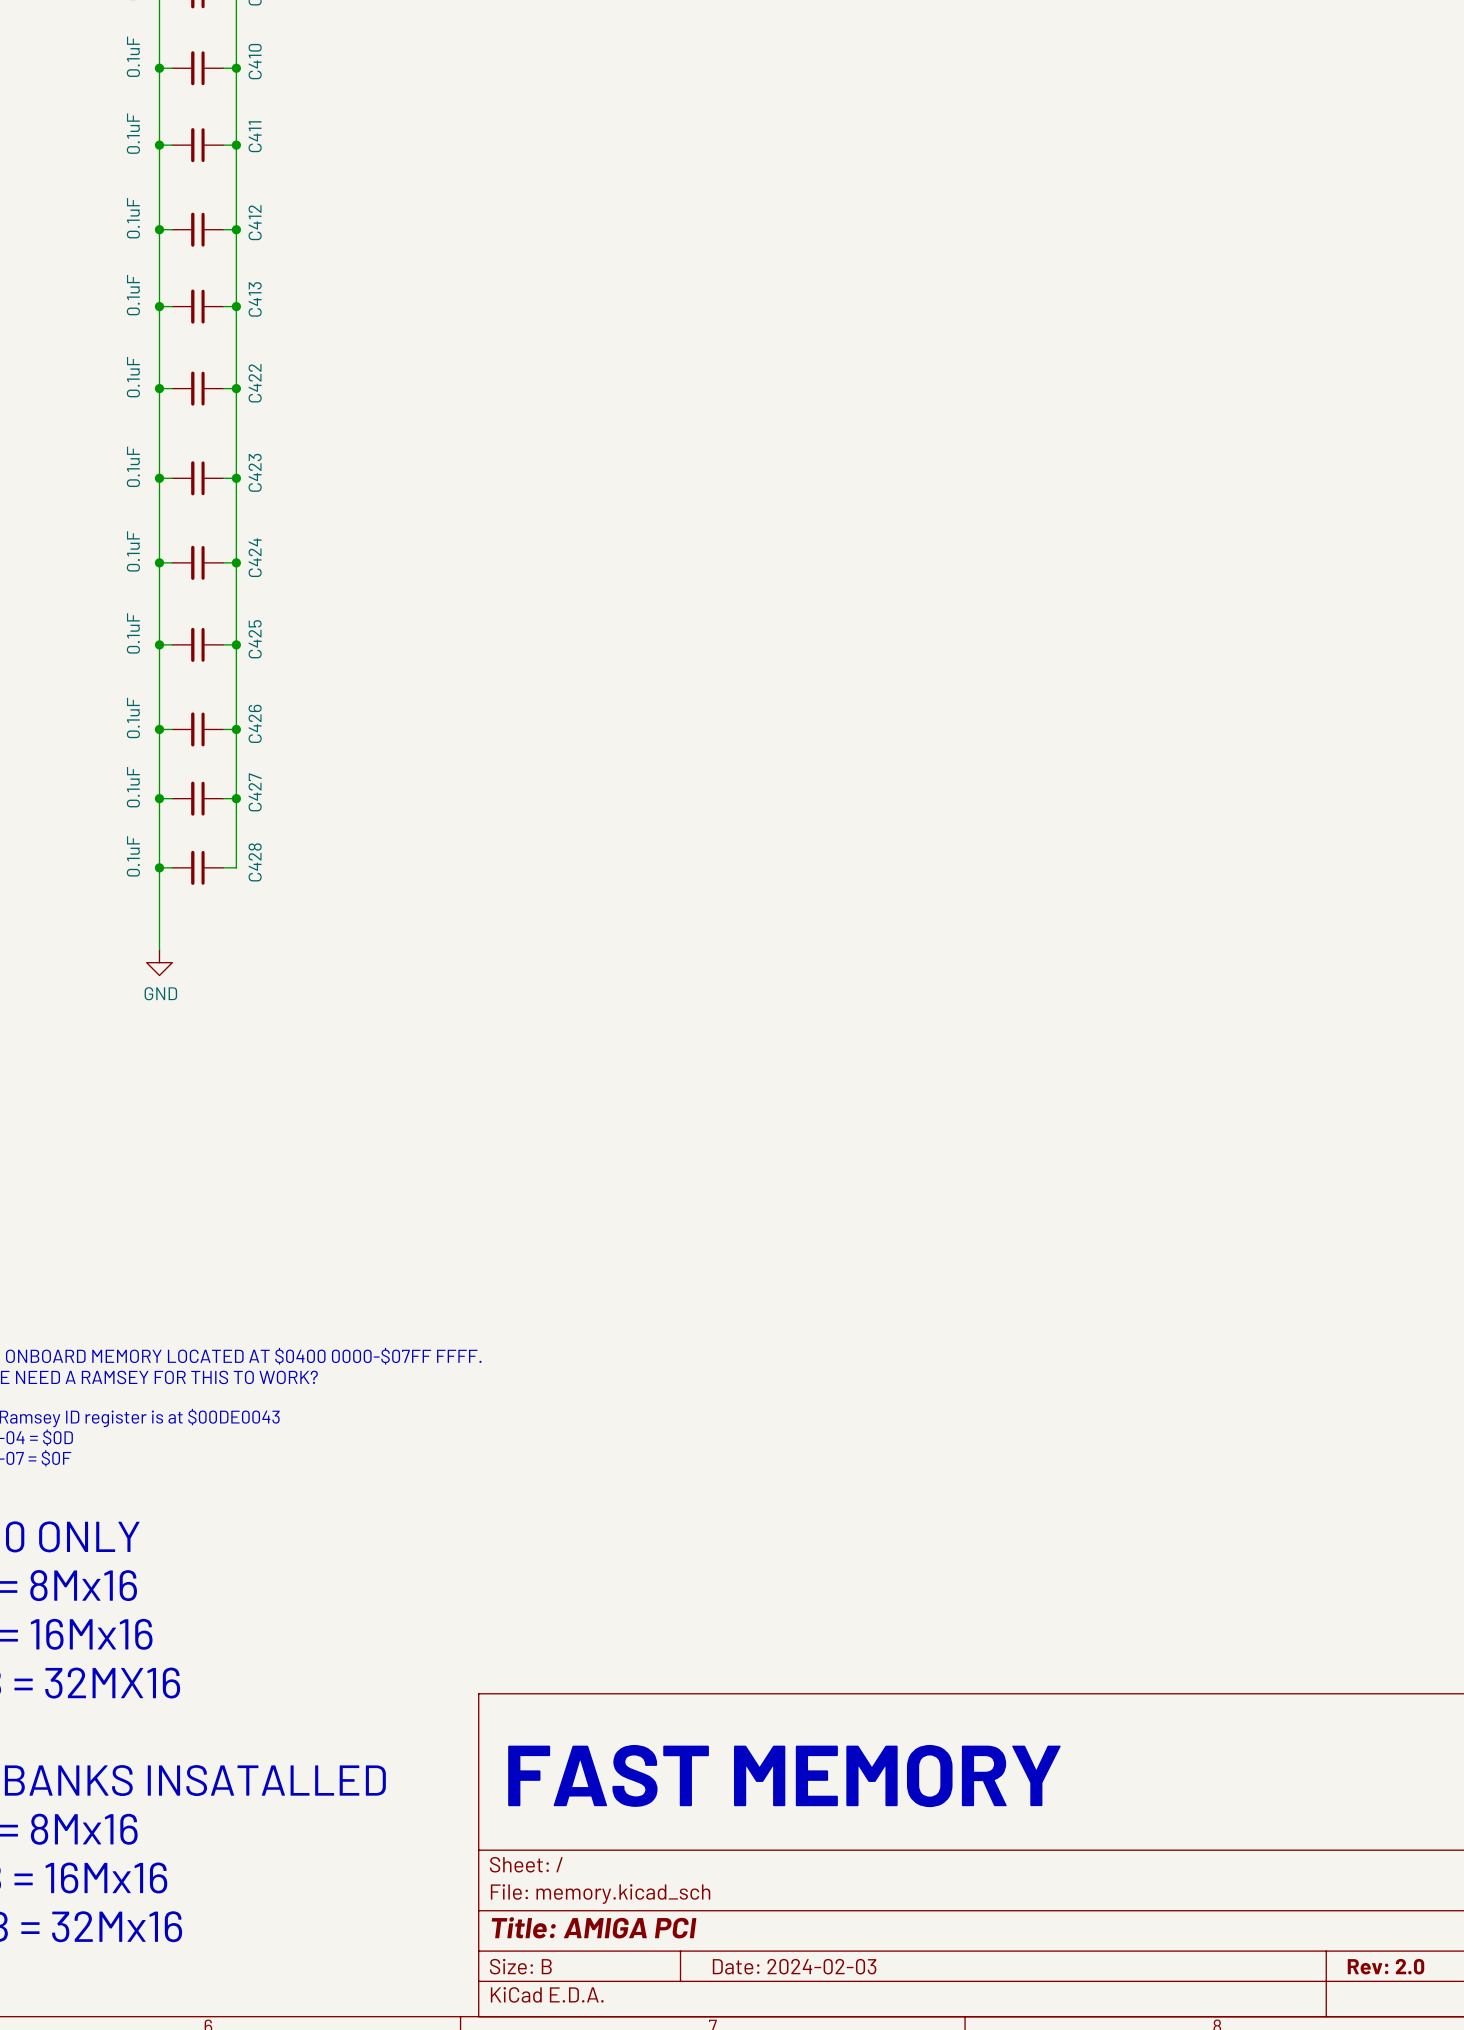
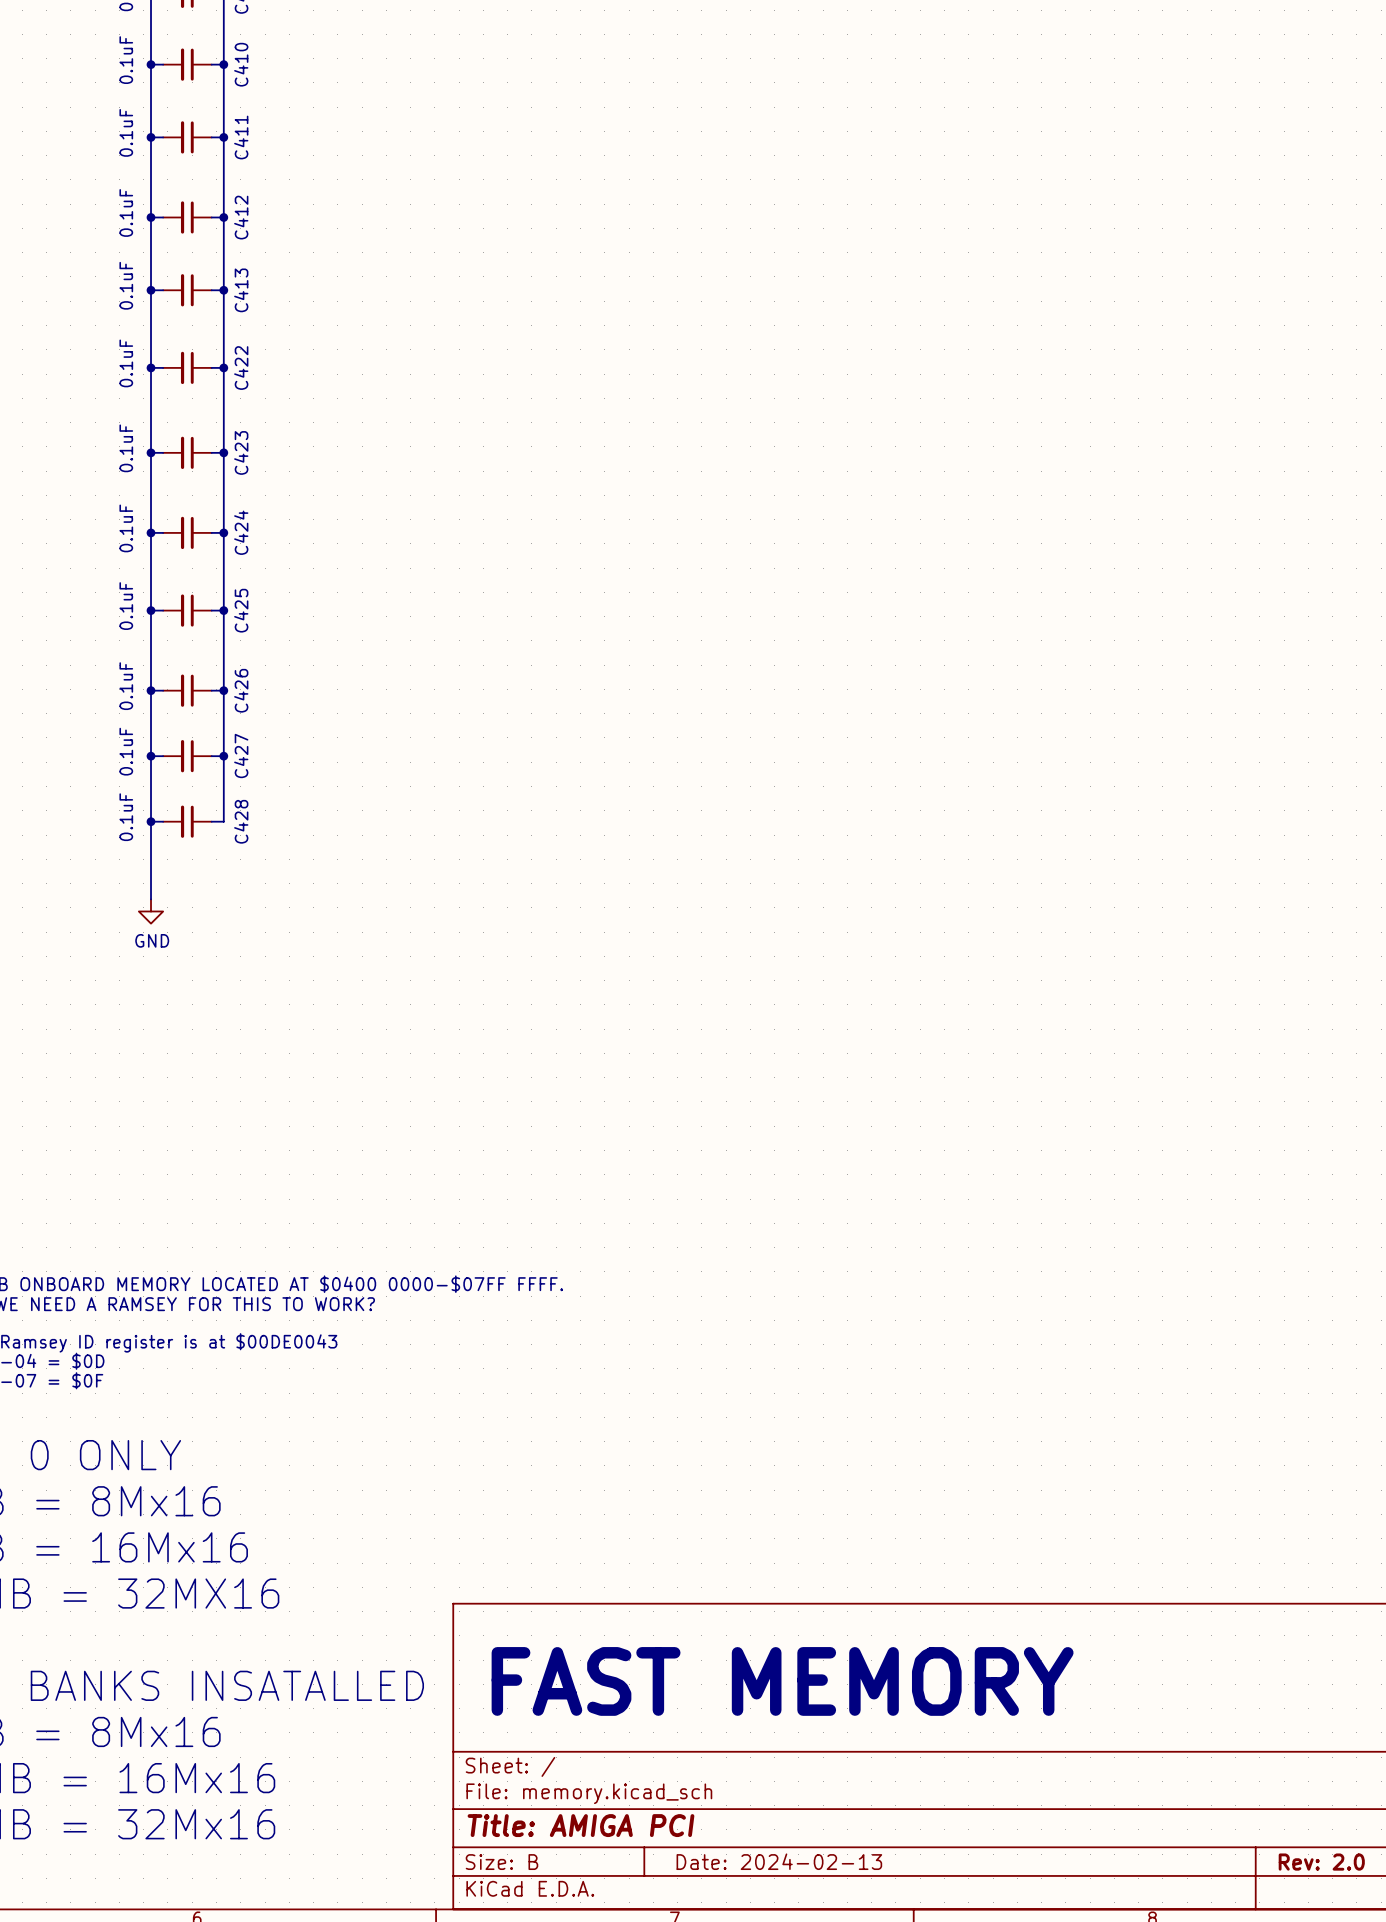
title block: Date: 2024-02-03 (794, 1966) -> Date: 2024-02-13 (779, 1861)

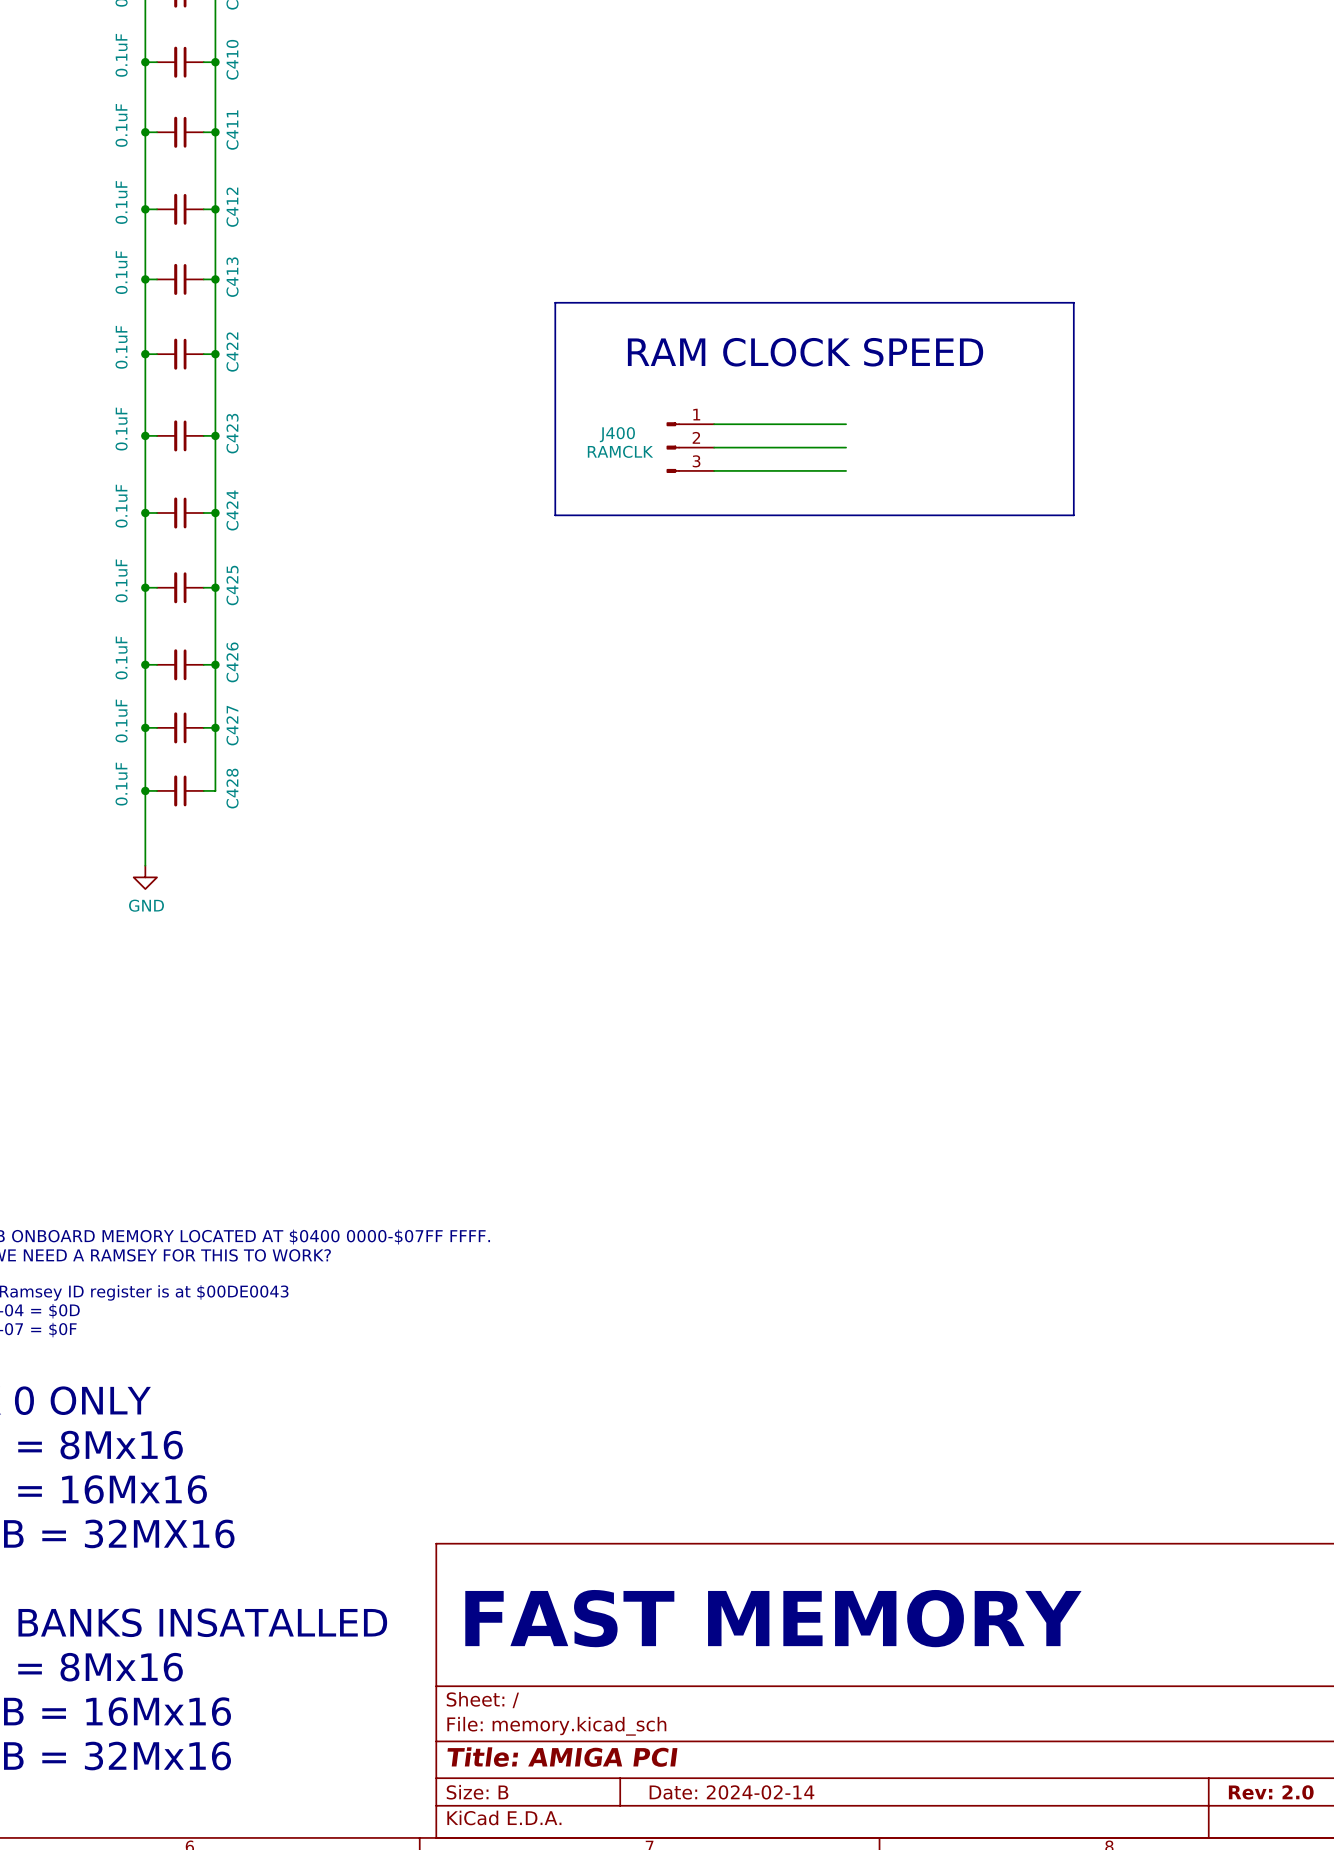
line: none -> (555, 302) (1073, 302) (1073, 515) (555, 515) (555, 302)
text: none -> RAM CLOCK SPEED (805, 352)
wire: none -> (714, 424) (846, 424)
J400: none -> RAMCLK (690, 447)
wire: none -> (714, 447) (846, 447)
wire: none -> (714, 470) (846, 470)
title block: Date: 2024-02-13 (779, 1861) -> Date: 2024-02-14 (731, 1792)

